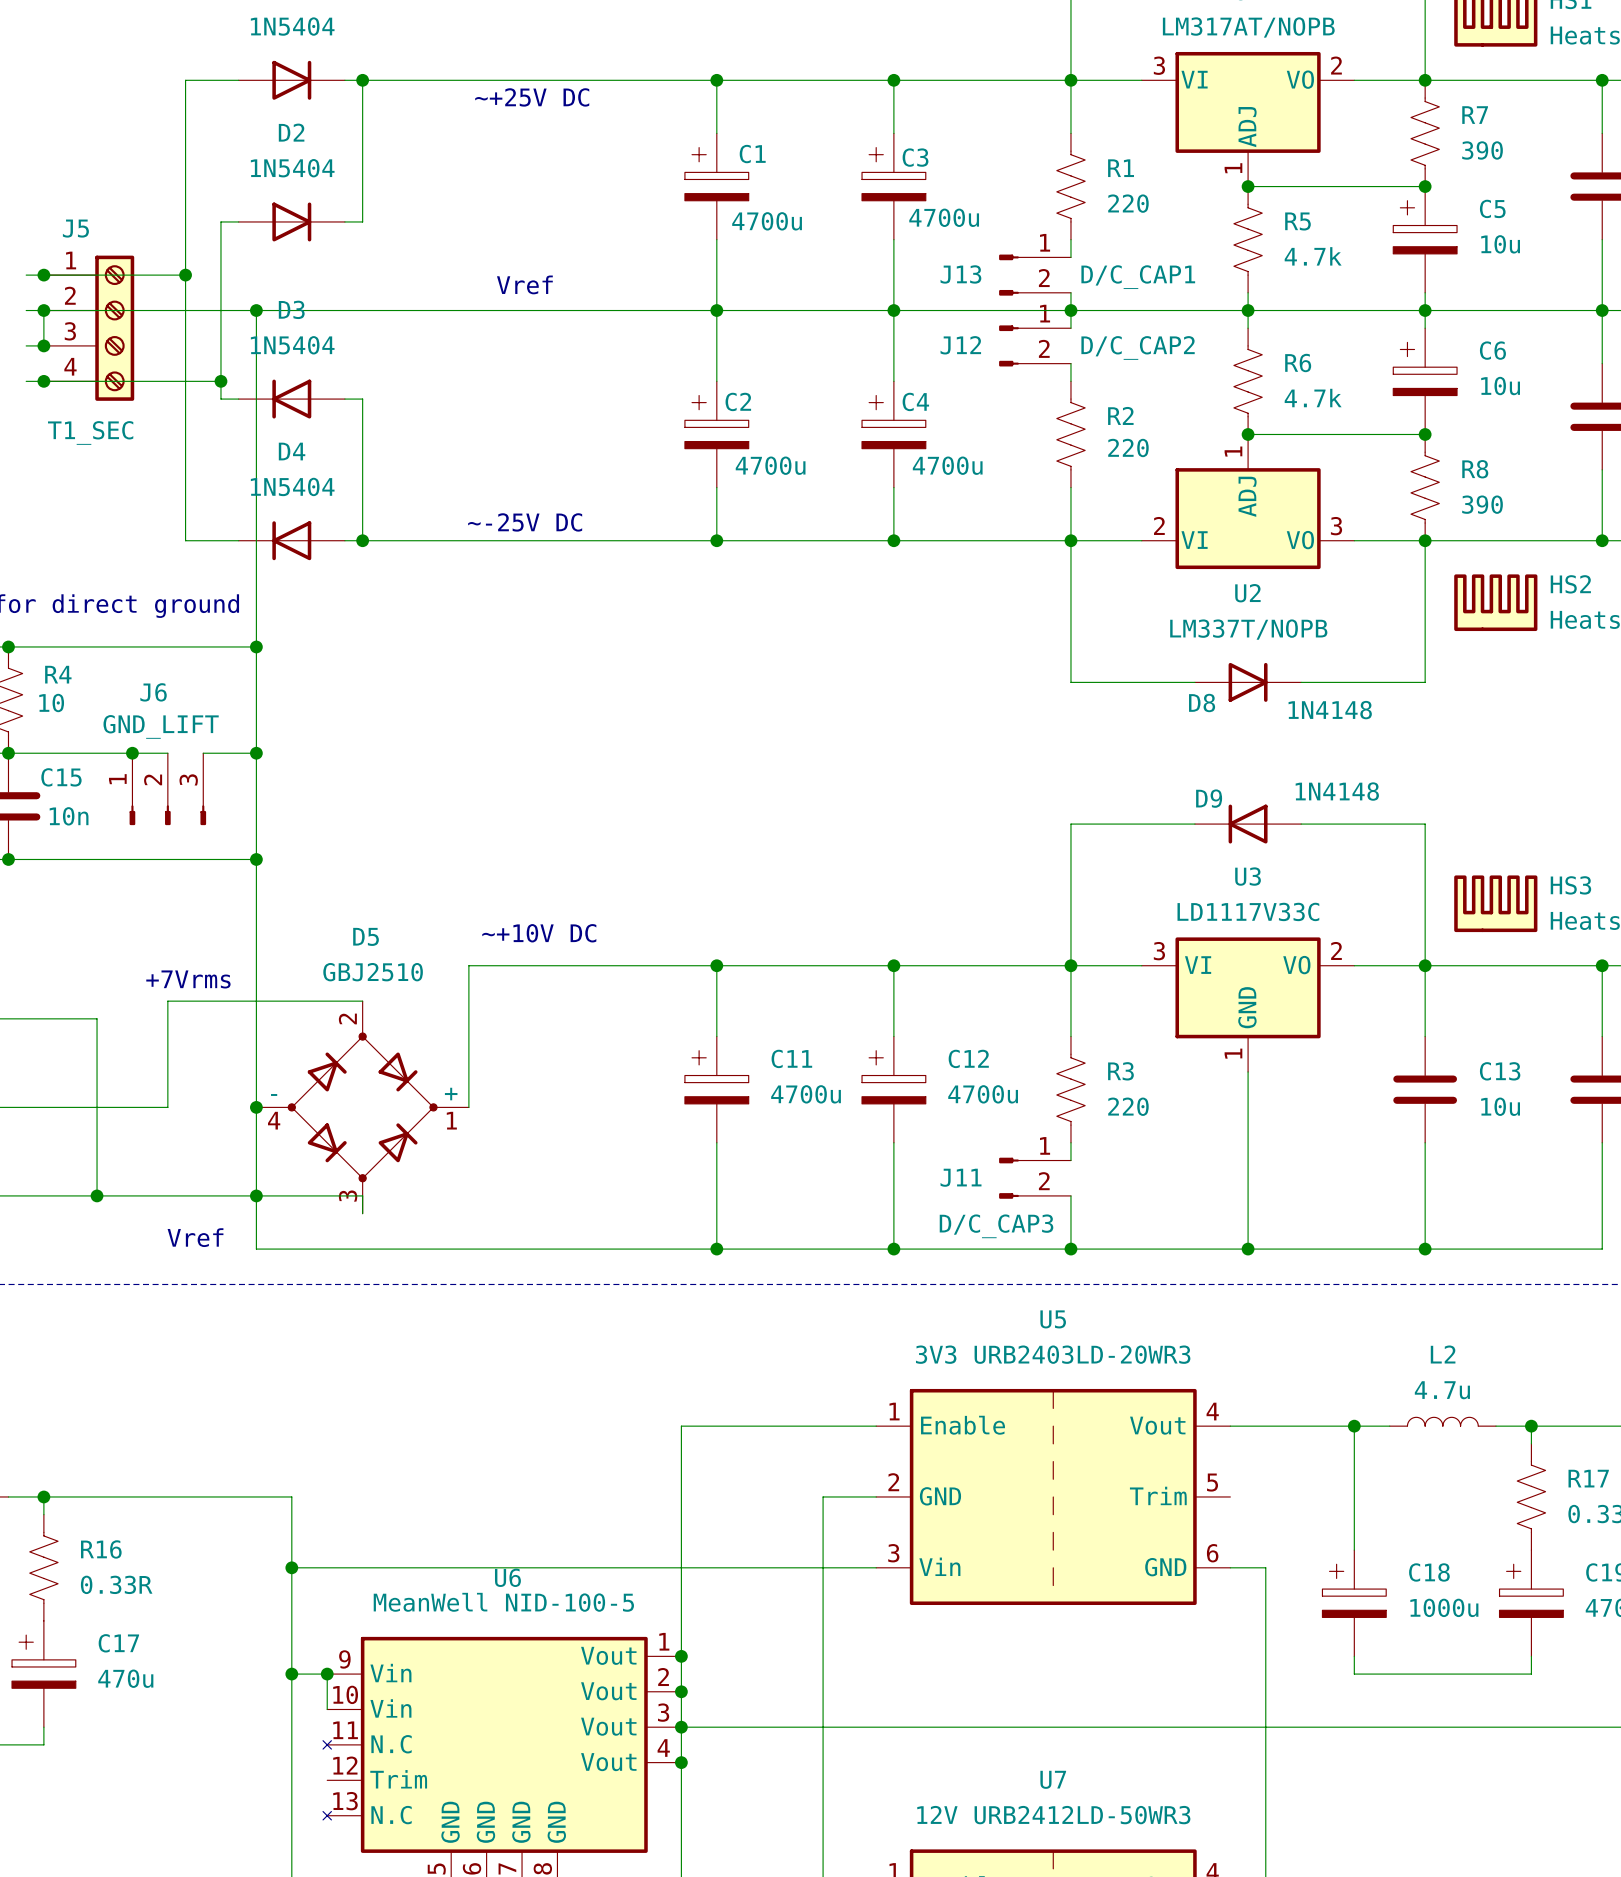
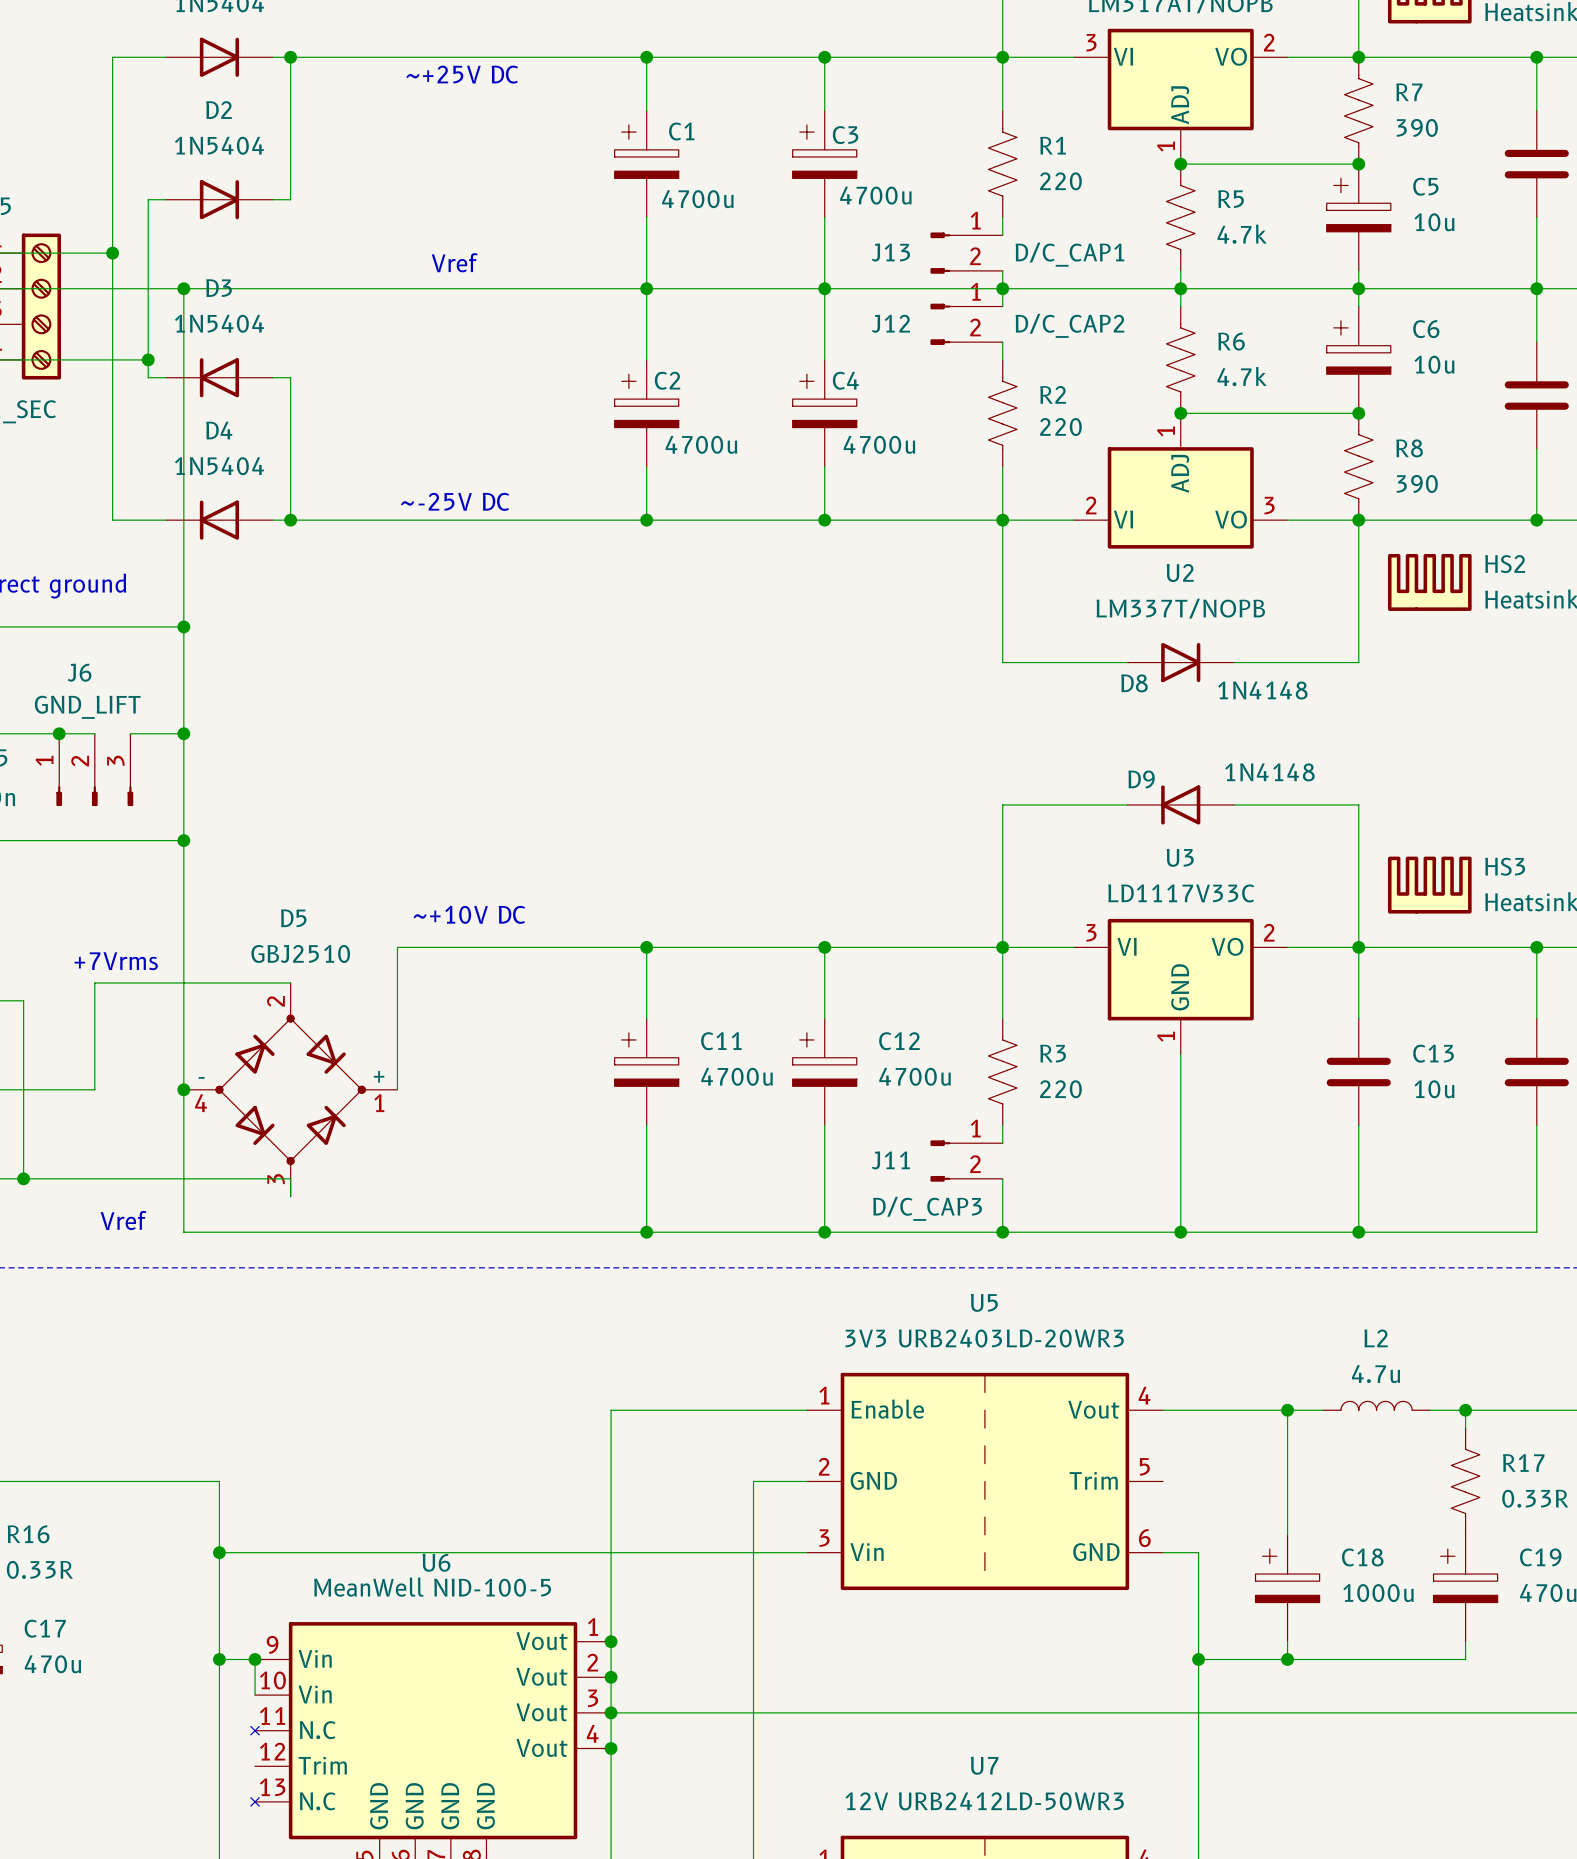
junction: (256, 1195) -> none
wire: none -> (1198, 1659) (1287, 1659)
junction: none -> (1198, 1659)
junction: none -> (1287, 1659)

